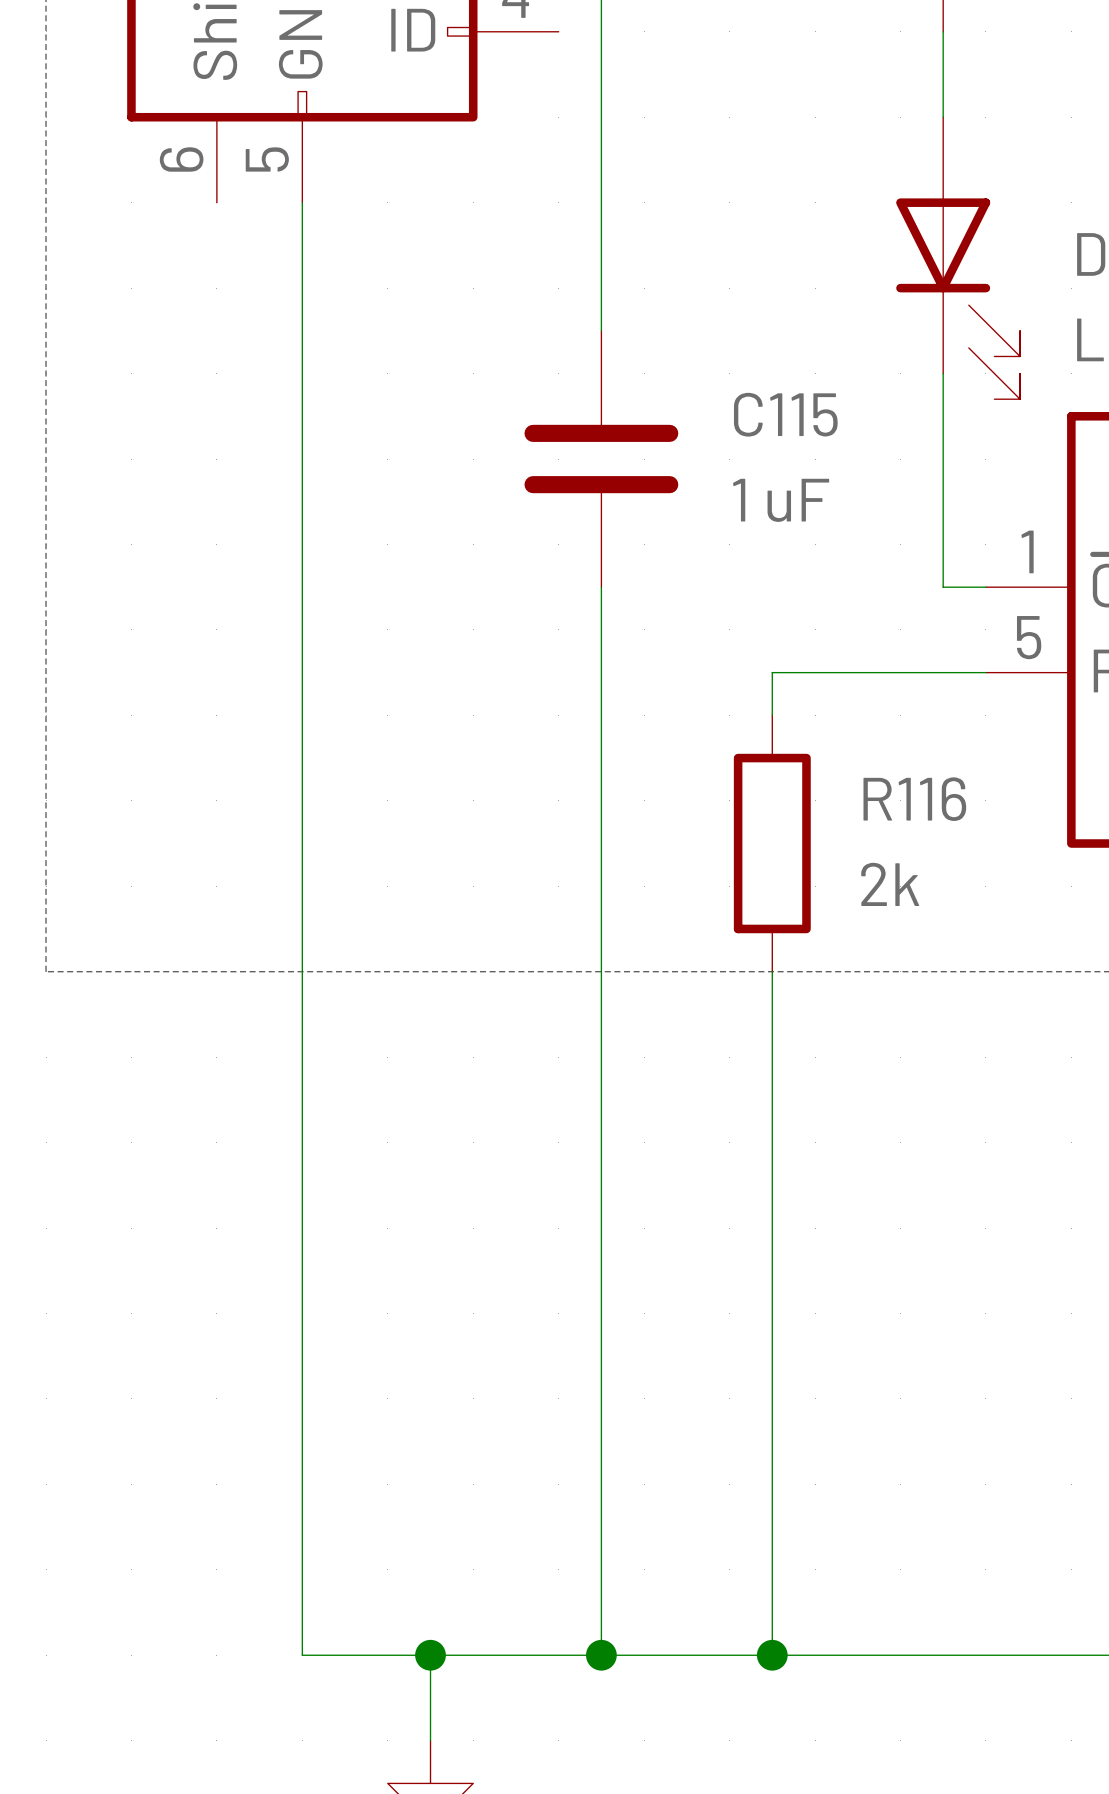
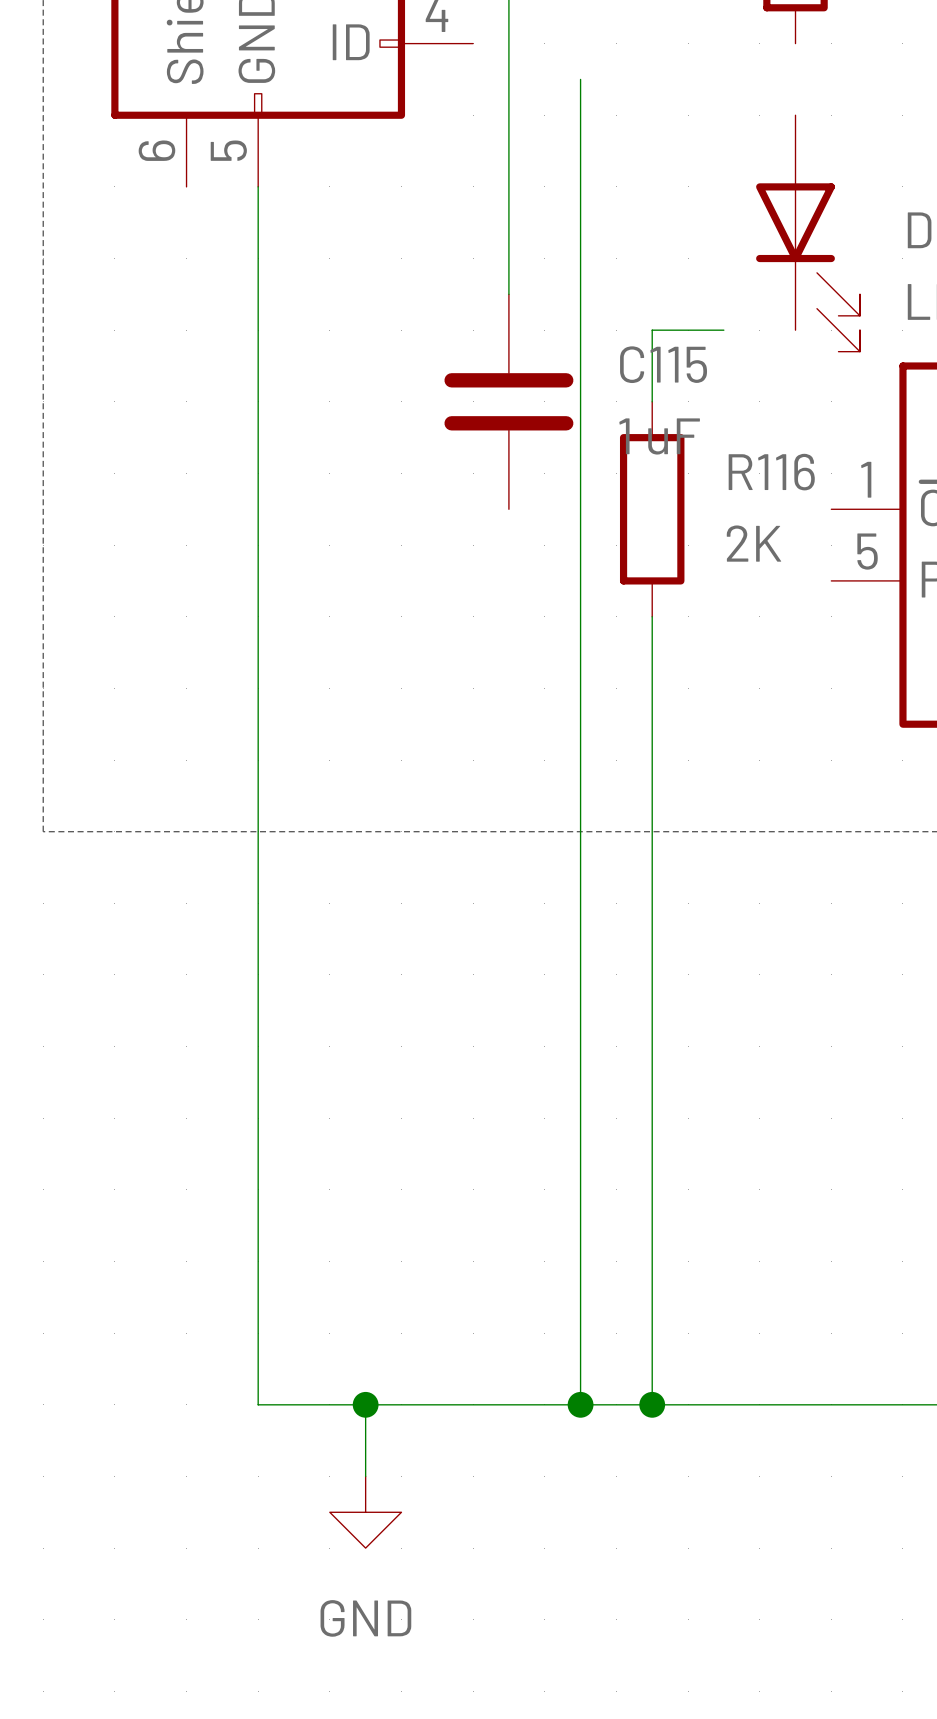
wire: (943, 31) (943, 117) -> none
wire: none -> (580, 79) (580, 1404)
wire: none -> (723, 330) (652, 330) (652, 401)
wire: (943, 373) (943, 587) (985, 587) -> none
wire: (601, 587) (601, 1655) -> none
wire: (985, 672) (772, 672) (772, 715) -> (652, 831) (652, 616)
R116 position: (772, 843) -> (652, 509)
R116 value: 2k (890, 884) -> 2K (753, 543)
junction position: (601, 1655) -> (580, 1404)

